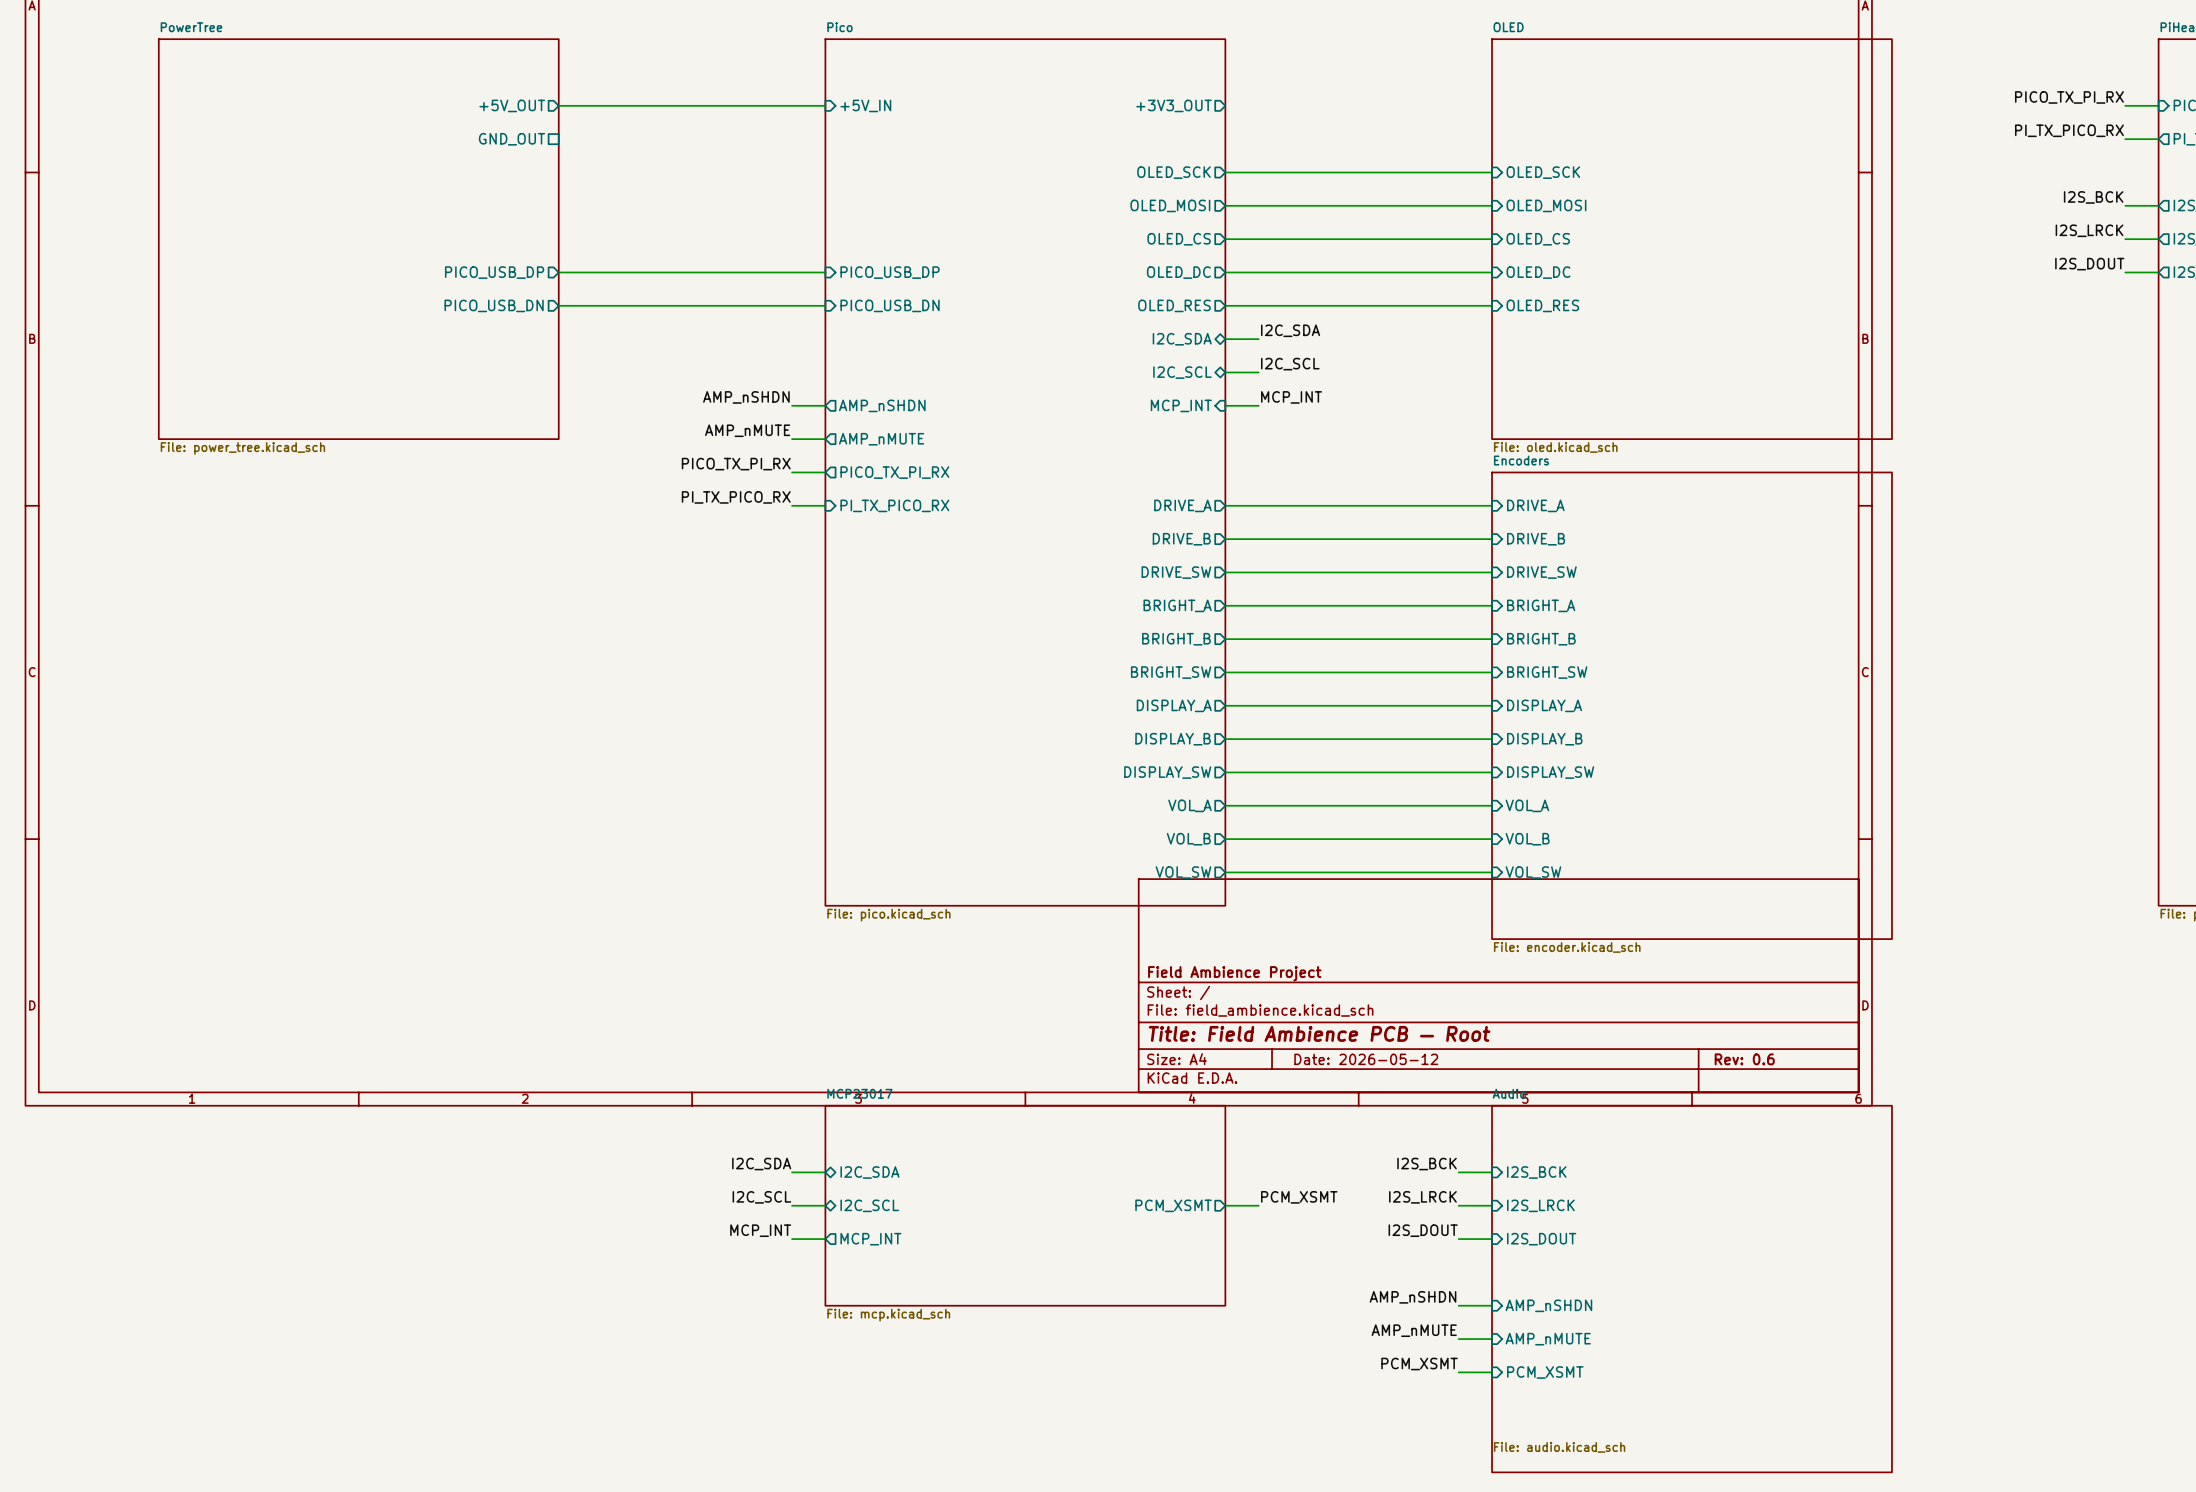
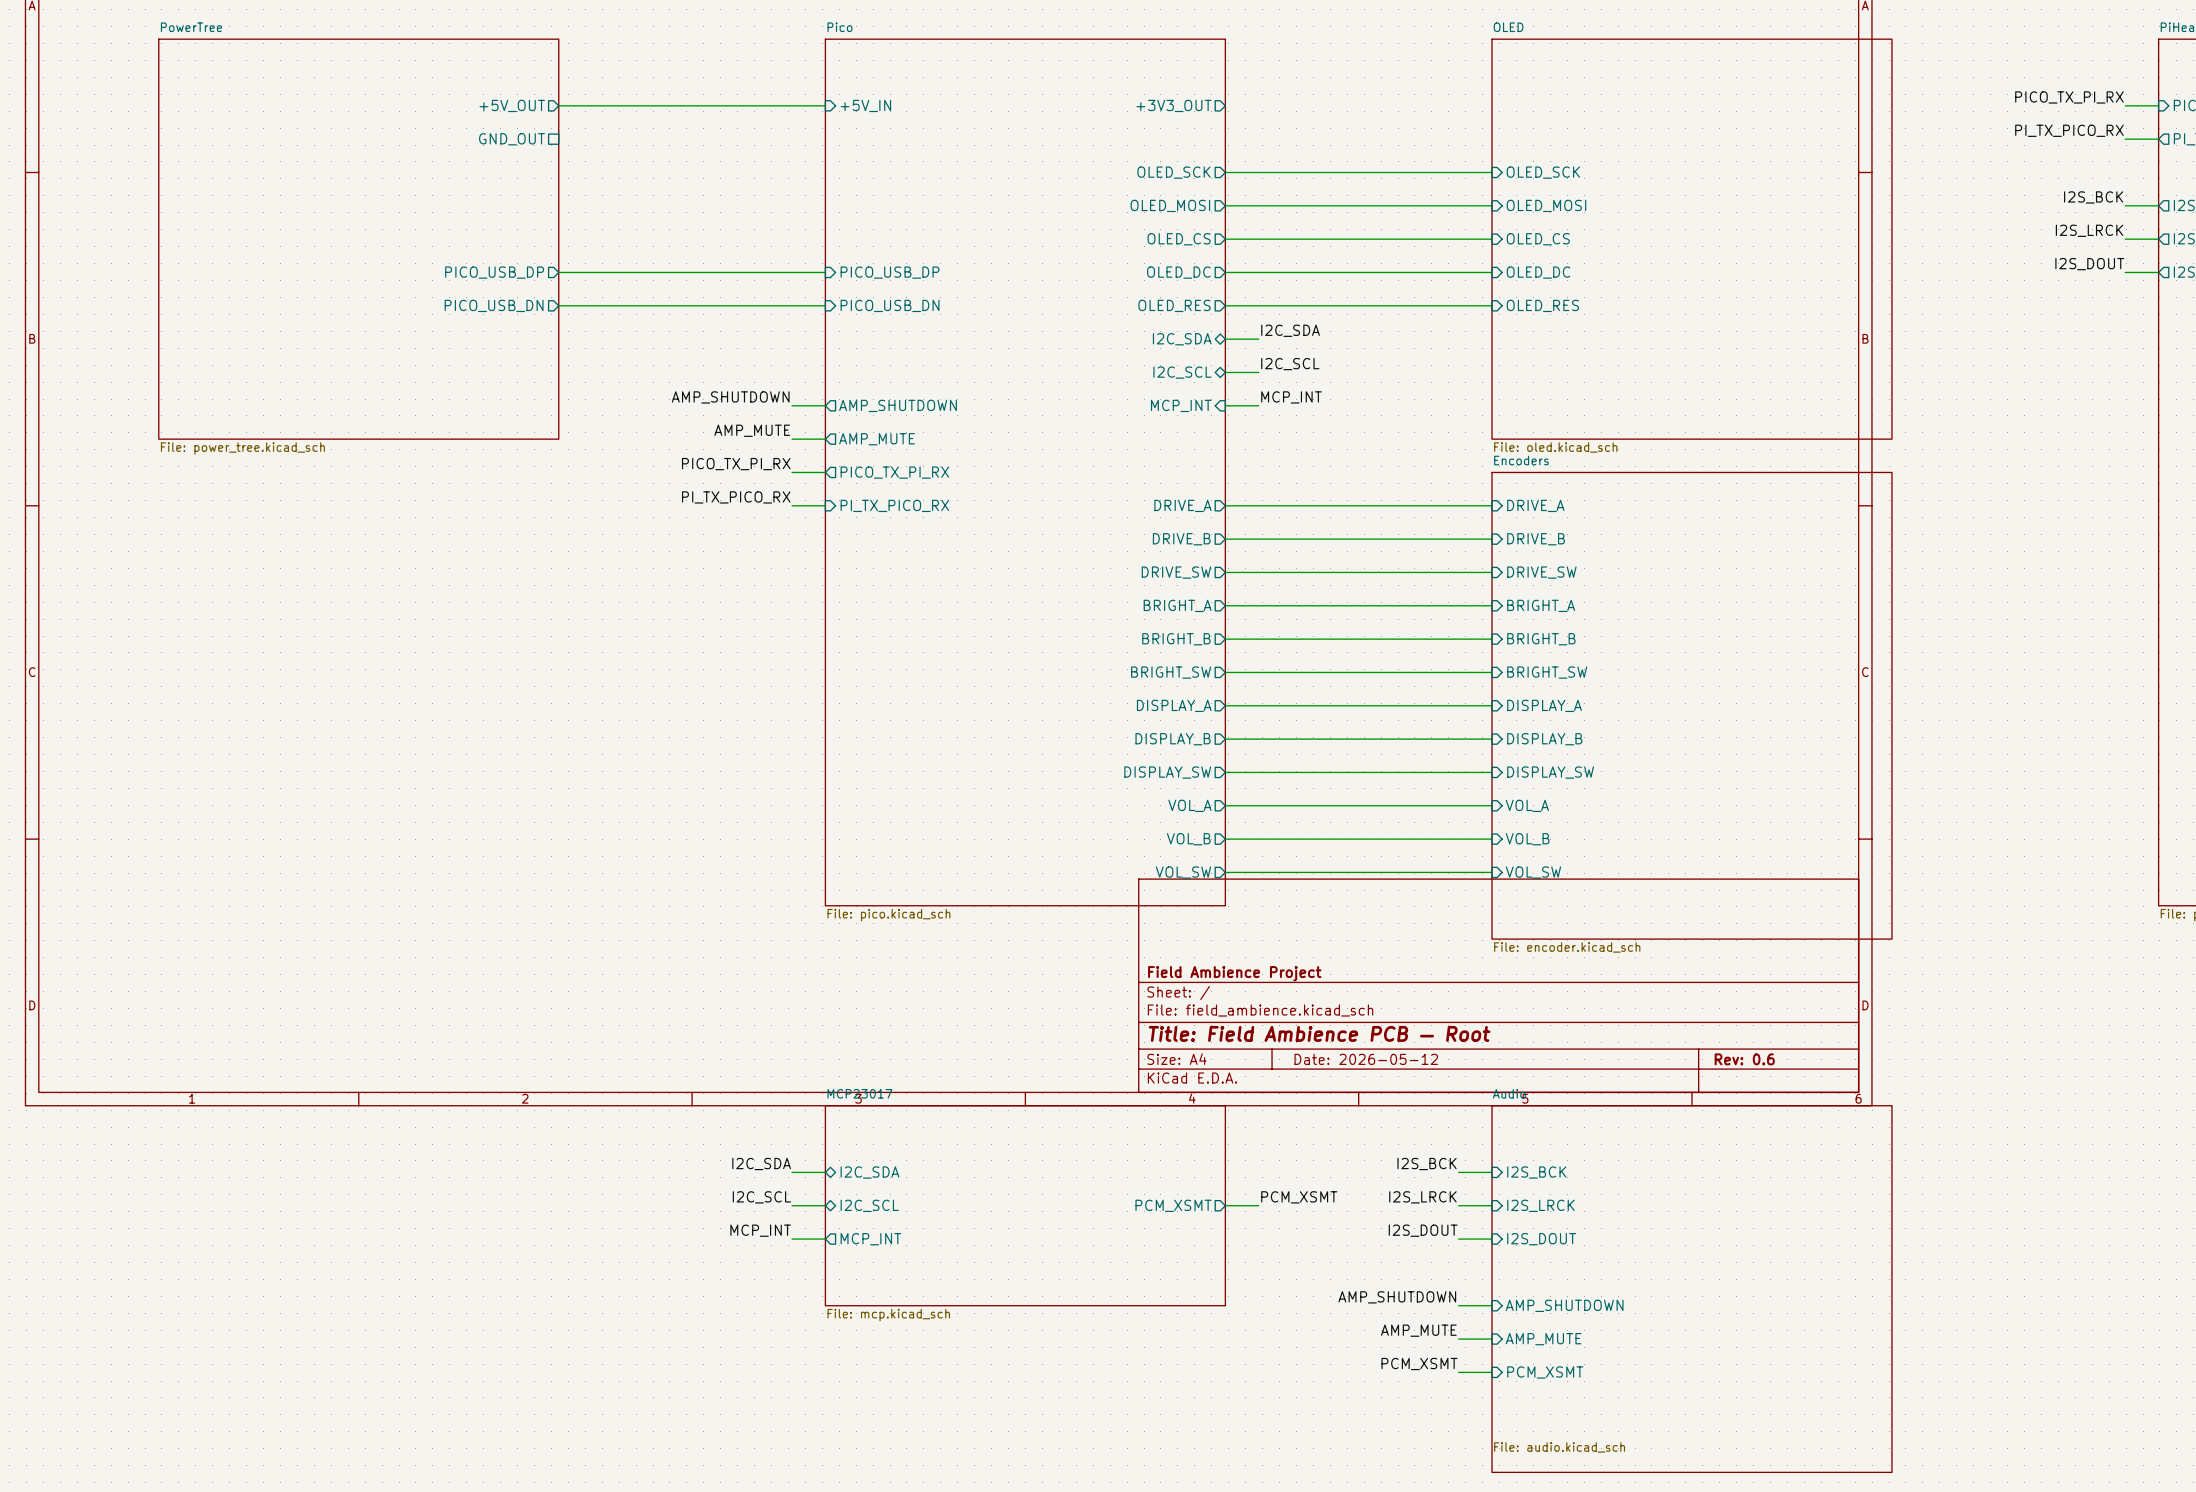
label: AMP_nSHDN (746, 397) -> AMP_SHUTDOWN (730, 397)
sheet pin: AMP_nSHDN (882, 405) -> AMP_SHUTDOWN (898, 405)
label: AMP_nMUTE (747, 430) -> AMP_MUTE (752, 430)
sheet pin: AMP_nMUTE (881, 439) -> AMP_MUTE (876, 439)
label: AMP_nSHDN (1413, 1297) -> AMP_SHUTDOWN (1397, 1297)
sheet pin: AMP_nSHDN (1548, 1305) -> AMP_SHUTDOWN (1564, 1305)
label: AMP_nMUTE (1414, 1330) -> AMP_MUTE (1418, 1330)
sheet pin: AMP_nMUTE (1548, 1339) -> AMP_MUTE (1543, 1339)

